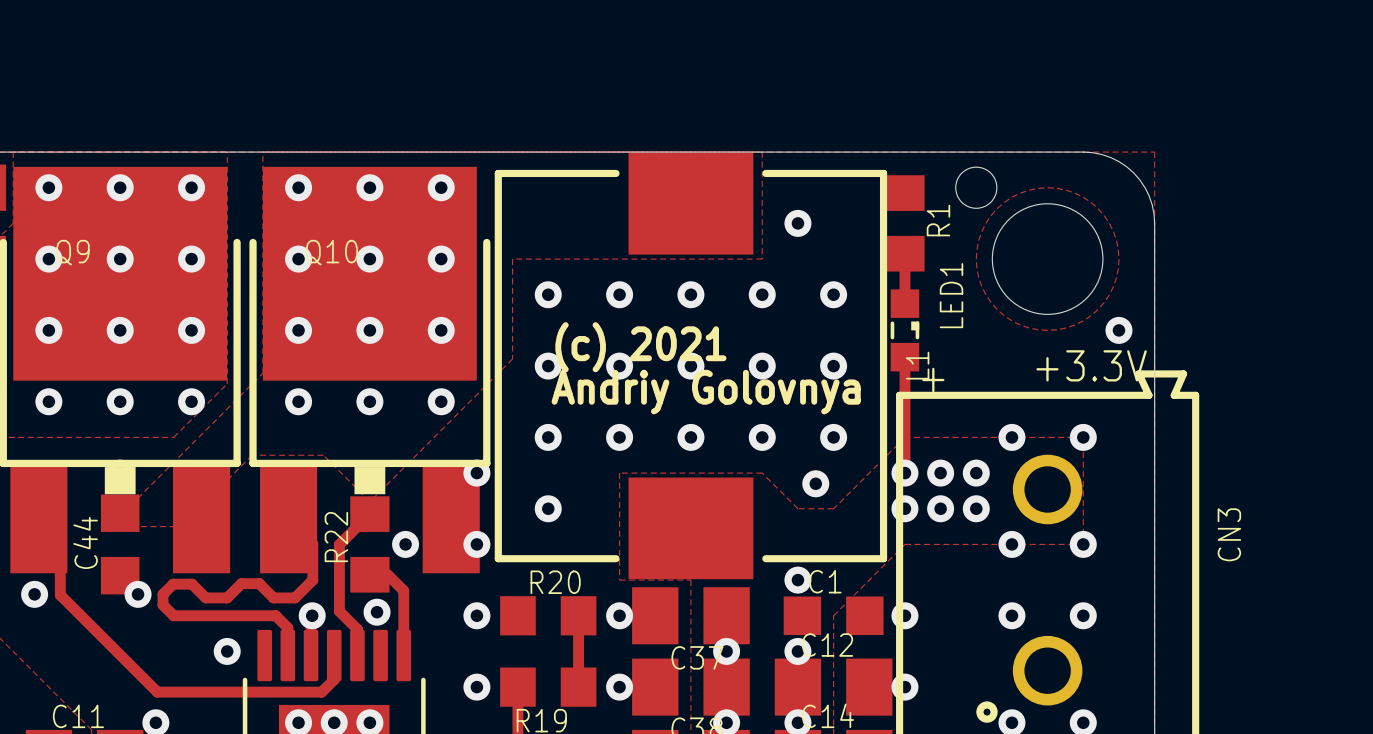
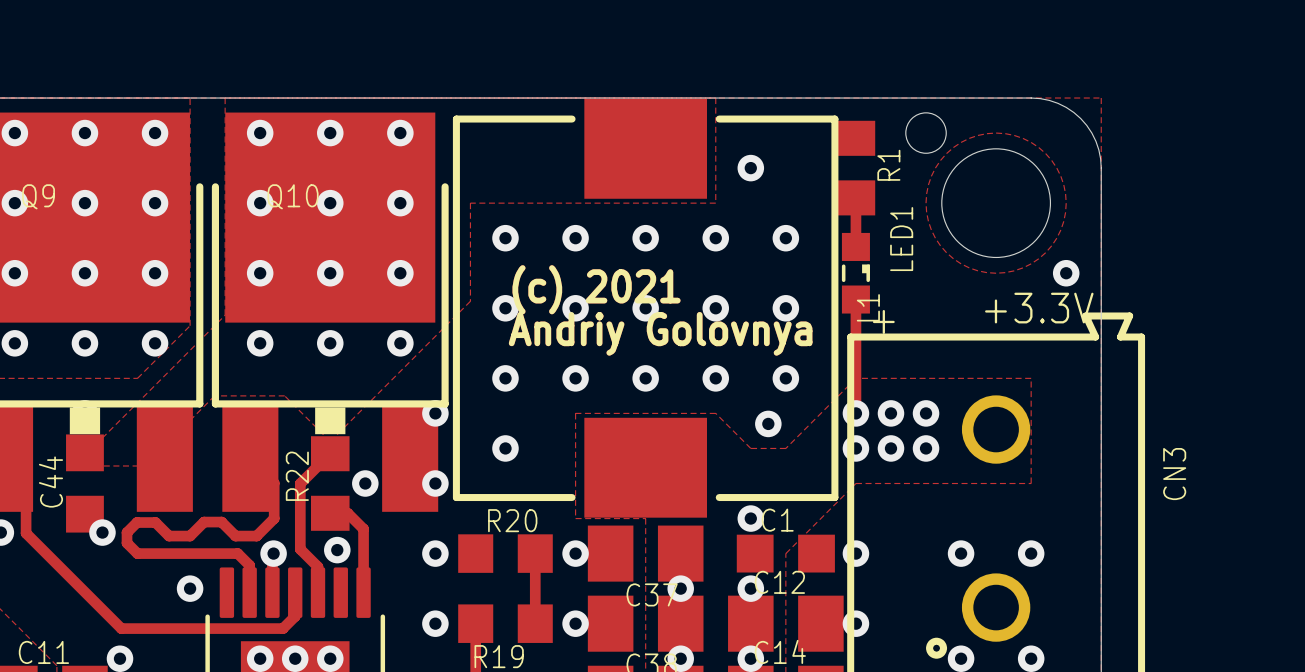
via: (1011, 437) -> none
via: (1083, 437) -> none
via: (1011, 544) -> none
via: (1083, 544) -> none

